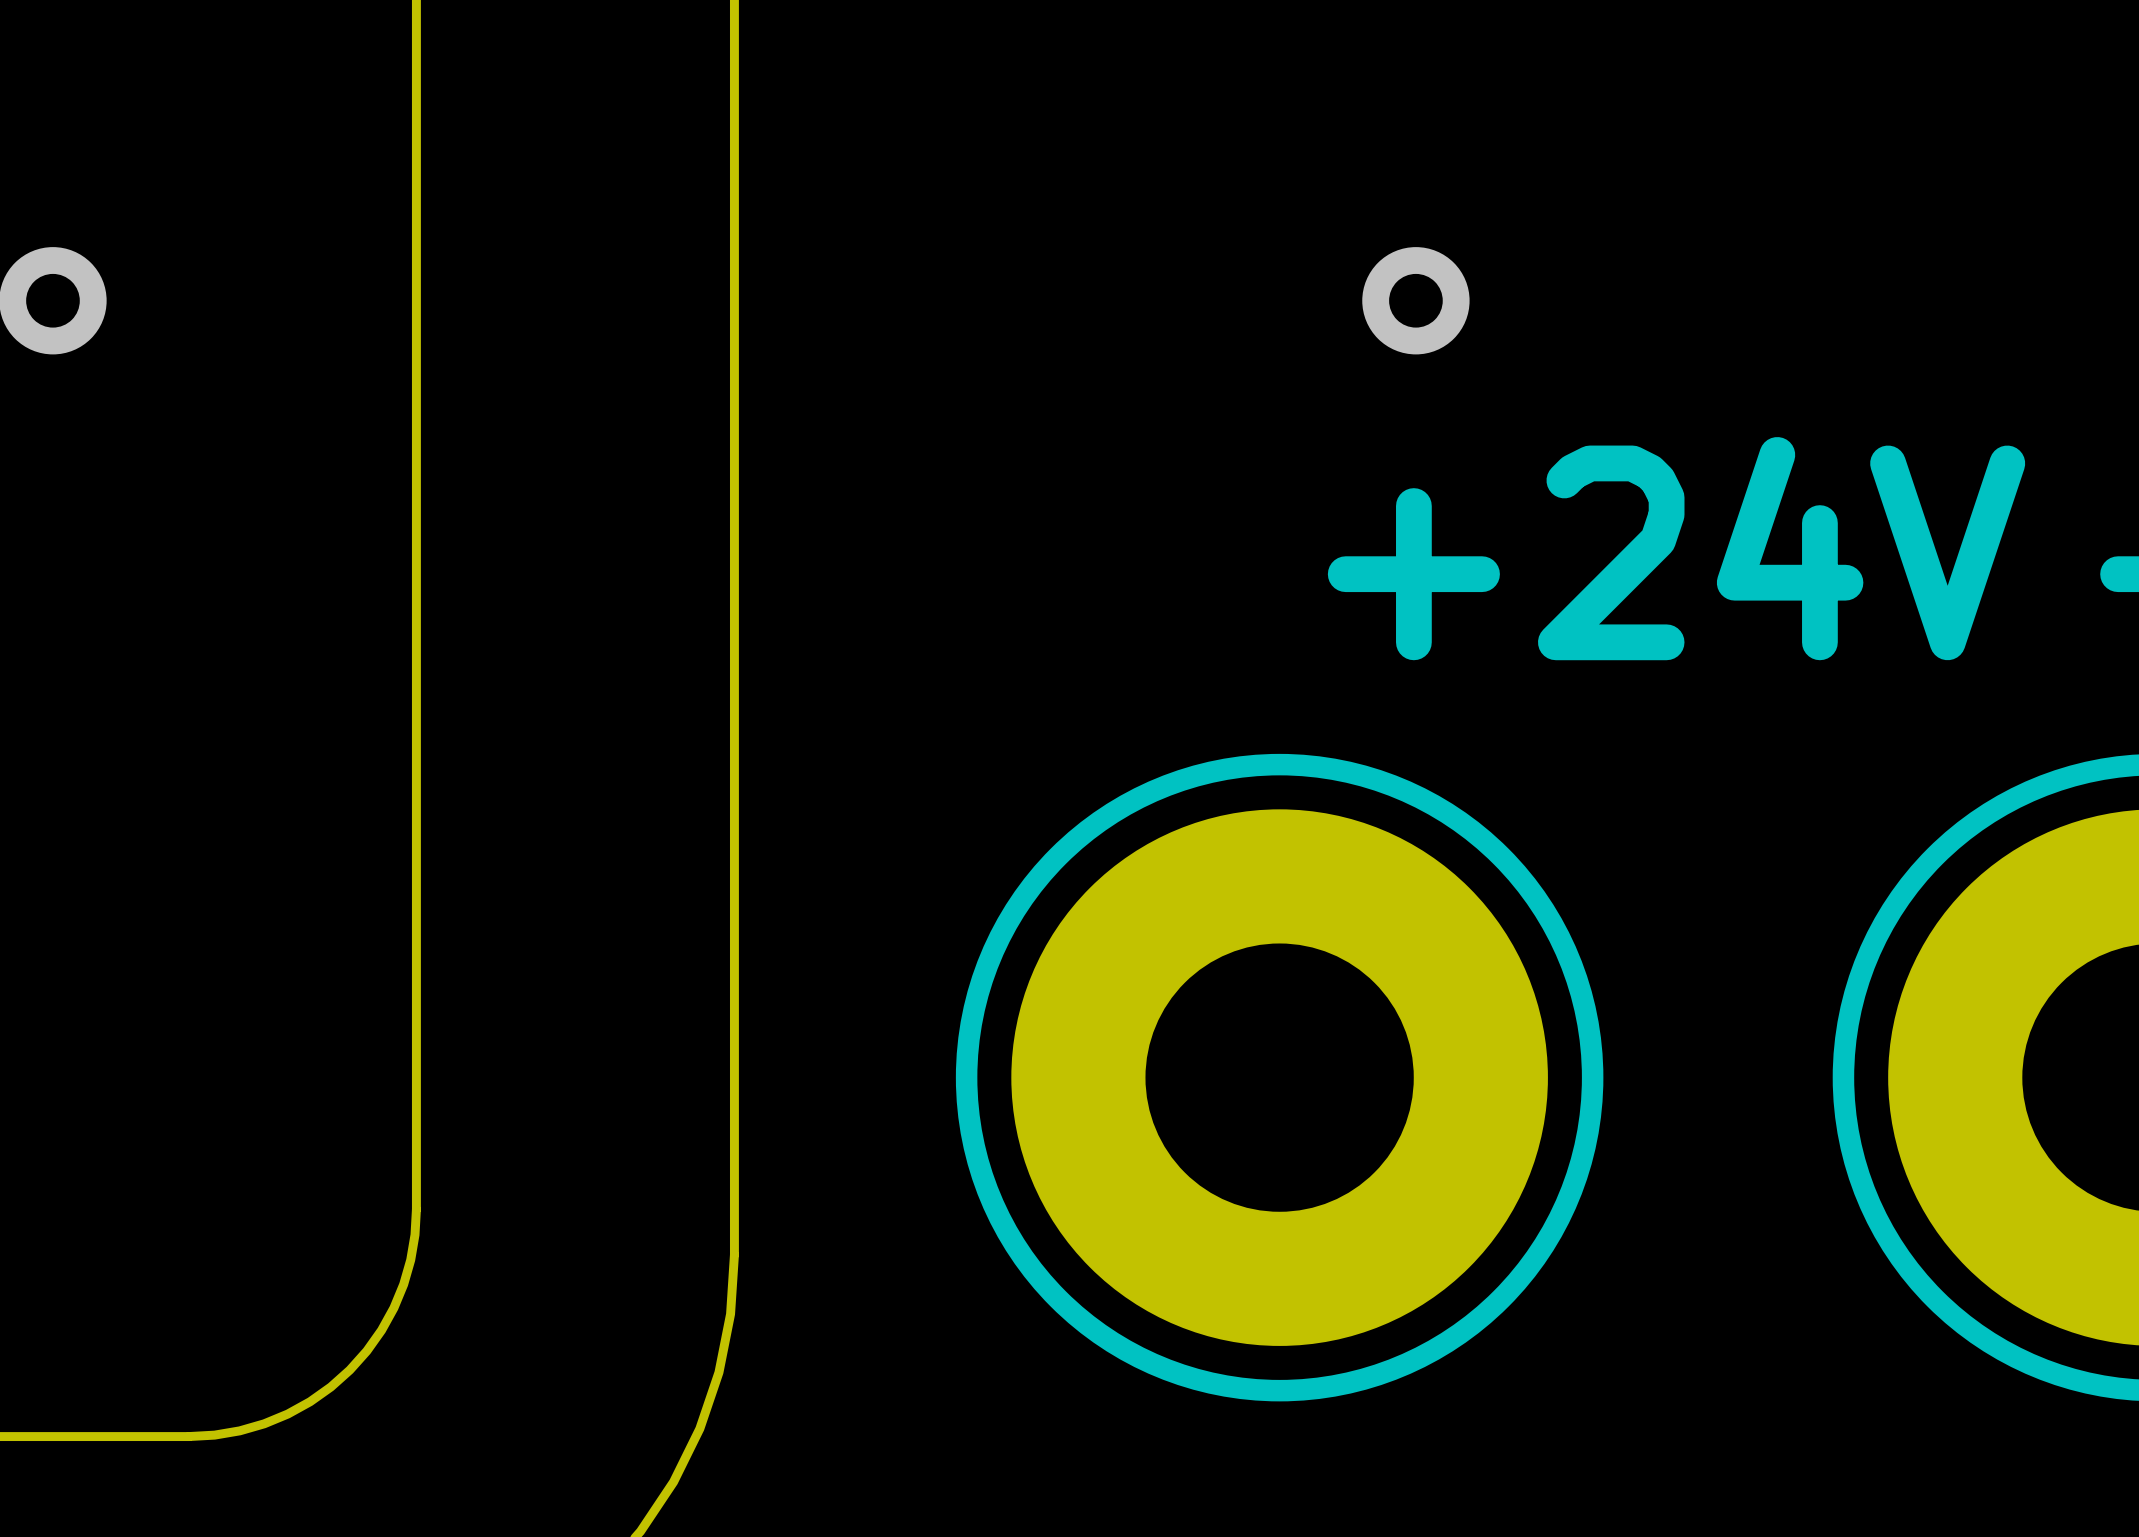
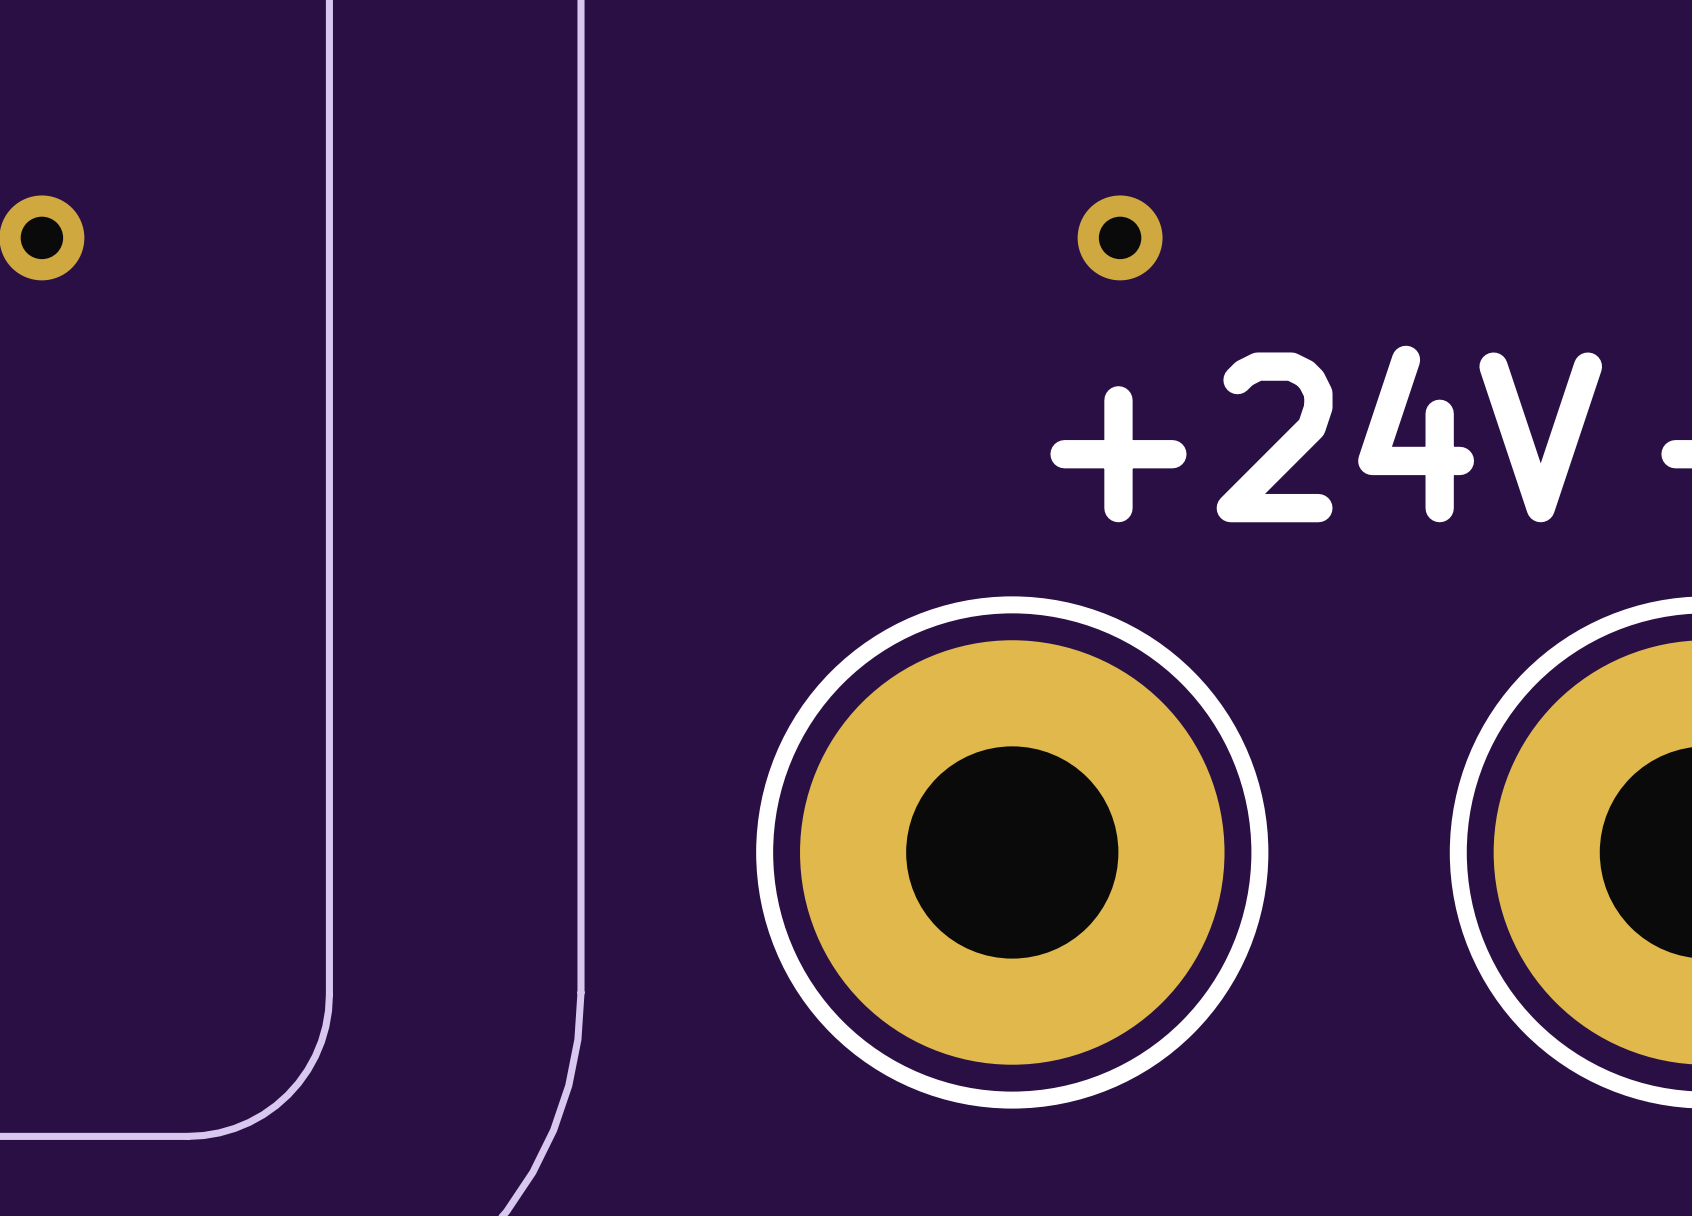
board edge: (416, 1209) (415, 1234) (403, 1284) (381, 1330) (349, 1370) (310, 1401) (287, 1414) (239, 1430) (189, 1436) -> (329, 956) (328, 1010) (321, 1041) (307, 1070) (287, 1094) (263, 1114) (234, 1128) (203, 1135) (149, 1136)

